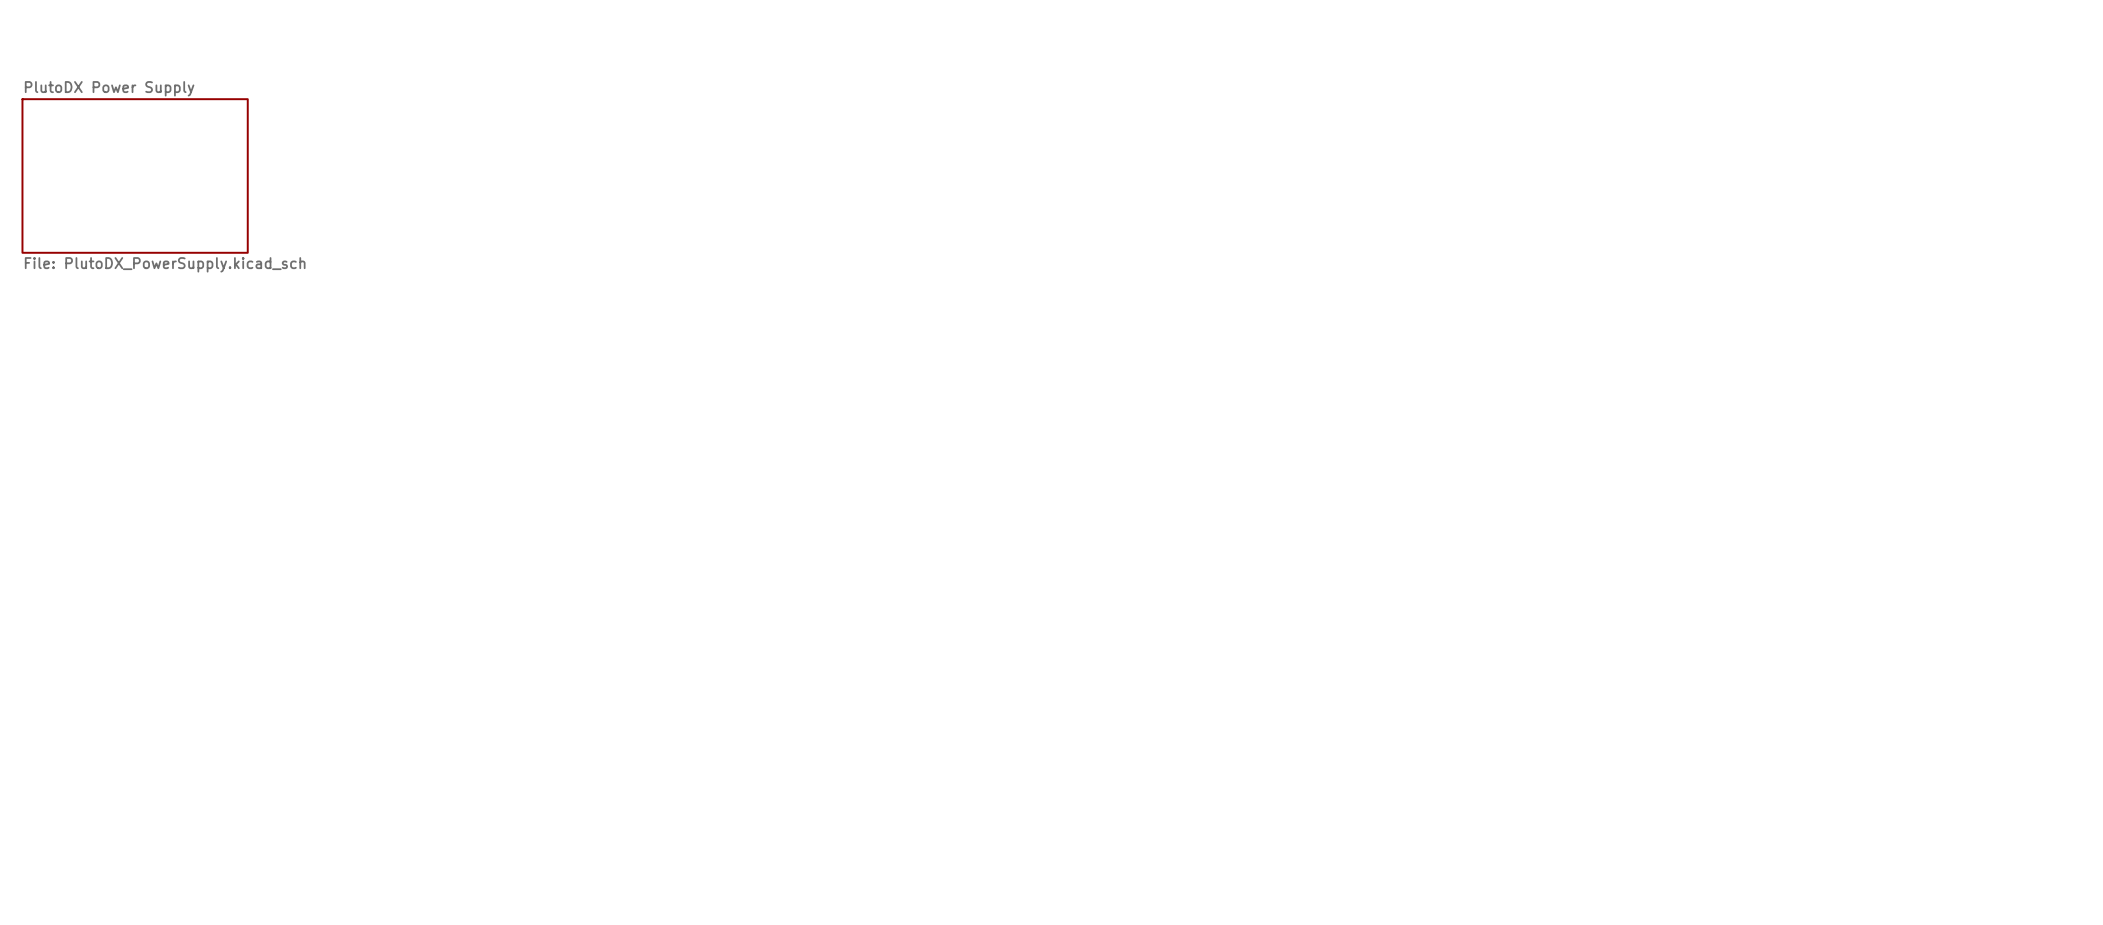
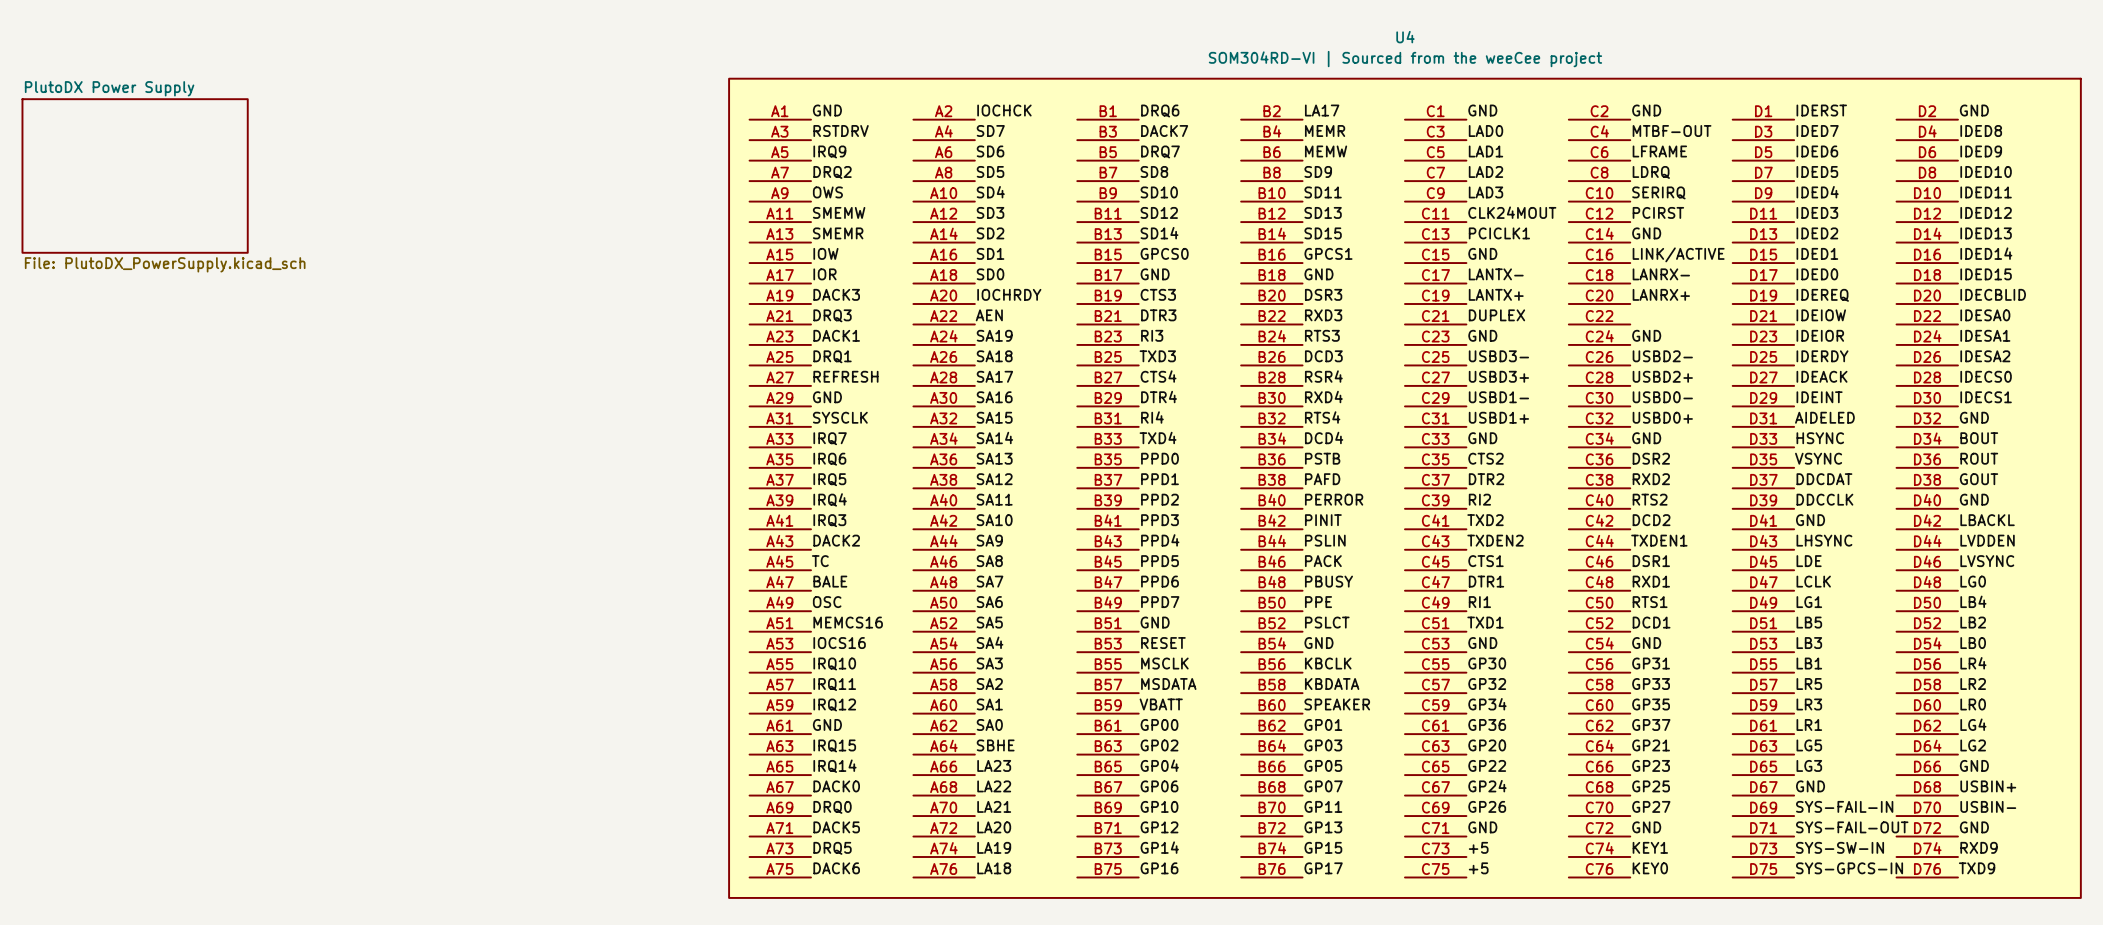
label: none -> GND (827, 110)
label: none -> IOCHCK (1004, 110)
label: none -> LA17 (1322, 110)
label: none -> GND (1482, 110)
label: none -> GND (1646, 110)
label: none -> IDERST (1821, 110)
label: none -> GND (1974, 110)
label: none -> DRQ6 (1160, 111)
label: none -> RSTDRV (841, 131)
label: none -> SD7 (990, 131)
label: none -> DACK7 (1164, 131)
label: none -> MEMR (1325, 131)
label: none -> LAD0 (1486, 131)
label: none -> MTBF-OUT (1672, 131)
label: none -> IDED7 (1817, 131)
label: none -> IDED8 (1981, 131)
label: none -> IRQ9 (829, 151)
label: none -> SD6 (990, 151)
label: none -> DRQ7 (1160, 151)
label: none -> MEMW (1326, 151)
label: none -> LAD1 (1486, 151)
label: none -> LFRAME (1659, 151)
label: none -> IDED6 (1817, 151)
label: none -> IDED9 (1981, 151)
label: none -> SD5 (990, 171)
label: none -> SD8 (1154, 171)
label: none -> SD9 (1318, 171)
label: none -> LAD2 (1486, 171)
label: none -> IDED5 (1817, 171)
label: none -> IDED10 (1986, 171)
label: none -> DRQ2 (832, 172)
label: none -> LDRQ (1651, 172)
label: none -> OWS (827, 192)
label: none -> SD4 (990, 192)
label: none -> SD10 (1159, 192)
label: none -> SD11 (1323, 192)
label: none -> LAD3 (1486, 192)
label: none -> SERIRQ (1658, 192)
label: none -> IDED4 (1817, 192)
label: none -> IDED11 (1986, 192)
label: none -> SMEMW (839, 212)
label: none -> SD3 (990, 212)
label: none -> SD12 (1159, 212)
label: none -> SD13 (1323, 212)
label: none -> CLK24MOUT (1512, 212)
label: none -> PCIRST (1658, 212)
label: none -> IDED3 (1817, 212)
label: none -> IDED12 (1986, 212)
label: none -> SMEMR (838, 233)
label: none -> SD2 (990, 233)
label: none -> SD14 (1159, 233)
label: none -> SD15 (1323, 233)
label: none -> PCICLK1 (1499, 233)
label: none -> GND (1646, 233)
label: none -> IDED2 (1817, 233)
label: none -> IDED13 (1986, 233)
label: none -> IOW (825, 253)
label: none -> SD1 (990, 253)
label: none -> GPCS0 (1164, 253)
label: none -> GPCS1 (1328, 253)
label: none -> GND (1482, 253)
label: none -> IDED1 (1817, 253)
label: none -> IDED14 (1986, 253)
label: none -> LINK/ACTIVE (1678, 254)
label: none -> IOR (824, 274)
label: none -> SD0 (990, 274)
label: none -> GND (1155, 274)
label: none -> GND (1318, 274)
label: none -> LANTX- (1496, 274)
label: none -> LANRX- (1661, 274)
label: none -> IDED0 (1817, 274)
label: none -> IDED15 (1986, 274)
label: none -> DACK3 (836, 294)
label: none -> IOCHRDY (1009, 294)
label: none -> CTS3 (1158, 294)
label: none -> DSR3 (1323, 294)
label: none -> LANTX+ (1496, 294)
label: none -> LANRX+ (1661, 294)
label: none -> IDECBLID (1993, 294)
label: none -> IDEREQ (1822, 295)
label: none -> DRQ3 (832, 315)
label: none -> AEN (989, 315)
label: none -> DTR3 (1158, 315)
label: none -> RXD3 (1323, 315)
label: none -> DUPLEX (1496, 315)
label: none -> IDEIOW (1821, 315)
label: none -> IDESA0 (1985, 315)
label: none -> DACK1 (836, 335)
label: none -> SA19 (994, 335)
label: none -> RI3 (1152, 335)
label: none -> RTS3 (1322, 335)
label: none -> GND (1482, 335)
label: none -> GND (1646, 335)
label: none -> IDEIOR (1820, 335)
label: none -> IDESA1 (1985, 335)
label: none -> DRQ1 (832, 356)
label: none -> SA18 (994, 356)
label: none -> TXD3 (1157, 356)
label: none -> DCD3 (1323, 356)
label: none -> USBD3- (1498, 356)
label: none -> USBD2- (1662, 356)
label: none -> IDERDY (1822, 356)
label: none -> IDESA2 (1985, 356)
label: none -> REFRESH (845, 376)
label: none -> SA17 (994, 376)
label: none -> CTS4 (1158, 376)
label: none -> RSR4 (1323, 376)
label: none -> USBD3+ (1498, 376)
label: none -> USBD2+ (1662, 376)
label: none -> IDEACK (1821, 376)
label: none -> IDECS0 (1986, 376)
label: none -> GND (827, 397)
label: none -> SA16 (994, 397)
label: none -> DTR4 (1159, 397)
label: none -> RXD4 (1323, 397)
label: none -> USBD1- (1498, 397)
label: none -> USBD0- (1662, 397)
label: none -> IDEINT (1819, 397)
label: none -> IDECS1 (1986, 397)
label: none -> SYSCLK (840, 417)
label: none -> SA15 (994, 417)
label: none -> RI4 (1152, 417)
label: none -> RTS4 (1322, 417)
label: none -> USBD1+ (1498, 417)
label: none -> USBD0+ (1662, 417)
label: none -> AIDELED (1824, 417)
label: none -> GND (1974, 417)
label: none -> SA14 (994, 437)
label: none -> TXD4 (1158, 437)
label: none -> DCD4 (1324, 437)
label: none -> IRQ7 (830, 438)
label: none -> GND (1482, 438)
label: none -> GND (1646, 438)
label: none -> HSYNC (1820, 438)
label: none -> BOUT (1979, 438)
label: none -> SA13 (994, 458)
label: none -> PPD0 (1160, 458)
label: none -> PSTB (1322, 458)
label: none -> CTS2 (1486, 458)
label: none -> DSR2 (1651, 458)
label: none -> VSYNC (1818, 458)
label: none -> ROUT (1979, 458)
label: none -> IRQ6 (829, 459)
label: none -> IRQ5 (829, 479)
label: none -> SA12 (994, 479)
label: none -> PPD1 (1160, 479)
label: none -> PAFD (1322, 479)
label: none -> DTR2 (1486, 479)
label: none -> RXD2 (1651, 479)
label: none -> DDCDAT (1824, 479)
label: none -> GOUT (1979, 479)
U4: none -> SOM304RD-VI | Sourced from the weeCee project (1404, 488)
label: none -> IRQ4 (830, 499)
label: none -> SA11 (994, 499)
label: none -> PPD2 (1160, 499)
label: none -> PERROR (1334, 499)
label: none -> RI2 (1479, 499)
label: none -> RTS2 (1650, 499)
label: none -> DDCCLK (1824, 499)
label: none -> GND (1974, 499)
label: none -> IRQ3 (829, 520)
label: none -> SA10 (994, 520)
label: none -> PPD3 (1160, 520)
label: none -> PINIT (1323, 520)
label: none -> TXD2 (1485, 520)
label: none -> DCD2 (1651, 520)
label: none -> GND (1810, 520)
label: none -> LBACKL (1987, 520)
label: none -> DACK2 (836, 540)
label: none -> SA9 (989, 540)
label: none -> PPD4 (1160, 540)
label: none -> PSLIN (1325, 540)
label: none -> TXDEN2 (1495, 540)
label: none -> TXDEN1 (1659, 540)
label: none -> LHSYNC (1824, 540)
label: none -> LVDDEN (1987, 540)
label: none -> TC (820, 561)
label: none -> SA8 (989, 561)
label: none -> PPD5 (1160, 561)
label: none -> PACK (1323, 561)
label: none -> CTS1 (1486, 561)
label: none -> DSR1 (1651, 561)
label: none -> LDE (1809, 561)
label: none -> LVSYNC (1987, 561)
label: none -> BALE (830, 581)
label: none -> SA7 (990, 581)
label: none -> PPD6 (1160, 581)
label: none -> PBUSY (1328, 581)
label: none -> DTR1 (1486, 581)
label: none -> RXD1 (1651, 581)
label: none -> LCLK (1813, 581)
label: none -> LG0 (1973, 581)
label: none -> LB4 (1973, 601)
label: none -> OSC (827, 602)
label: none -> SA6 (989, 602)
label: none -> PPD7 (1160, 602)
label: none -> PPE (1318, 602)
label: none -> RI1 (1479, 602)
label: none -> RTS1 (1650, 602)
label: none -> LG1 (1809, 602)
label: none -> MEMCS16 (848, 622)
label: none -> SA5 (989, 622)
label: none -> GND (1155, 622)
label: none -> PSLCT (1327, 622)
label: none -> TXD1 (1485, 622)
label: none -> DCD1 (1651, 622)
label: none -> LB5 (1809, 622)
label: none -> LB2 (1973, 622)
label: none -> SA4 (990, 642)
label: none -> IOCS16 (839, 643)
label: none -> RESET (1163, 643)
label: none -> GND (1318, 643)
label: none -> GND (1482, 643)
label: none -> GND (1646, 643)
label: none -> LB3 (1809, 643)
label: none -> LB0 (1973, 643)
label: none -> SA3 (989, 663)
label: none -> MSCLK (1164, 663)
label: none -> KBCLK (1328, 663)
label: none -> GP30 (1487, 663)
label: none -> GP31 (1651, 663)
label: none -> LB1 (1809, 663)
label: none -> LR4 (1973, 663)
label: none -> IRQ10 (834, 664)
label: none -> IRQ11 (834, 684)
label: none -> SA2 (989, 684)
label: none -> MSDATA (1168, 684)
label: none -> KBDATA (1332, 684)
label: none -> GP32 (1487, 684)
label: none -> GP33 (1651, 684)
label: none -> LR5 (1809, 684)
label: none -> LR2 (1973, 684)
label: none -> IRQ12 (834, 704)
label: none -> SA1 (989, 704)
label: none -> VBATT (1161, 704)
label: none -> SPEAKER (1337, 704)
label: none -> GP34 (1487, 704)
label: none -> GP35 (1651, 704)
label: none -> LR3 (1809, 704)
label: none -> LR0 (1973, 704)
label: none -> GND (827, 724)
label: none -> SA0 (989, 724)
label: none -> GP00 (1159, 724)
label: none -> GP01 (1323, 724)
label: none -> GP36 (1487, 724)
label: none -> GP37 (1651, 724)
label: none -> LR1 (1809, 724)
label: none -> LG4 (1973, 724)
label: none -> IRQ15 (834, 745)
label: none -> SBHE (995, 745)
label: none -> GP02 (1159, 745)
label: none -> GP03 (1323, 745)
label: none -> GP20 (1487, 745)
label: none -> GP21 (1651, 745)
label: none -> LG5 (1809, 745)
label: none -> LG2 (1973, 745)
label: none -> LA23 (994, 765)
label: none -> GP04 (1159, 765)
label: none -> GP05 (1323, 765)
label: none -> GP22 (1487, 765)
label: none -> GP23 (1651, 765)
label: none -> LG3 (1809, 765)
label: none -> GND (1974, 765)
label: none -> IRQ14 (834, 766)
label: none -> DACK0 (836, 786)
label: none -> LA22 (994, 786)
label: none -> GP06 (1159, 786)
label: none -> GP07 (1323, 786)
label: none -> GP24 (1487, 786)
label: none -> GP25 (1651, 786)
label: none -> GND (1810, 786)
label: none -> USBIN+ (1988, 786)
label: none -> LA21 (994, 806)
label: none -> GP10 (1159, 806)
label: none -> GP11 (1323, 806)
label: none -> GP26 (1487, 806)
label: none -> GP27 (1651, 806)
label: none -> SYS-FAIL-IN (1844, 806)
label: none -> USBIN- (1988, 806)
label: none -> DRQ0 (832, 807)
label: none -> DACK5 (836, 827)
label: none -> LA20 (994, 827)
label: none -> GP12 (1159, 827)
label: none -> GP13 (1323, 827)
label: none -> GND (1482, 827)
label: none -> GND (1646, 827)
label: none -> SYS-FAIL-OUT (1852, 827)
label: none -> GND (1974, 827)
label: none -> LA19 (994, 847)
label: none -> GP14 (1159, 847)
label: none -> GP15 (1323, 847)
label: none -> +5 (1478, 847)
label: none -> KEY1 (1650, 847)
label: none -> SYS-SW-IN (1840, 847)
label: none -> RXD9 (1979, 847)
label: none -> DRQ5 (832, 848)
label: none -> DACK6 (836, 868)
label: none -> LA18 (994, 868)
label: none -> GP16 (1159, 868)
label: none -> GP17 (1323, 868)
label: none -> +5 (1478, 868)
label: none -> KEY0 (1650, 868)
label: none -> SYS-GPCS-IN (1849, 868)
label: none -> TXD9 (1977, 868)

